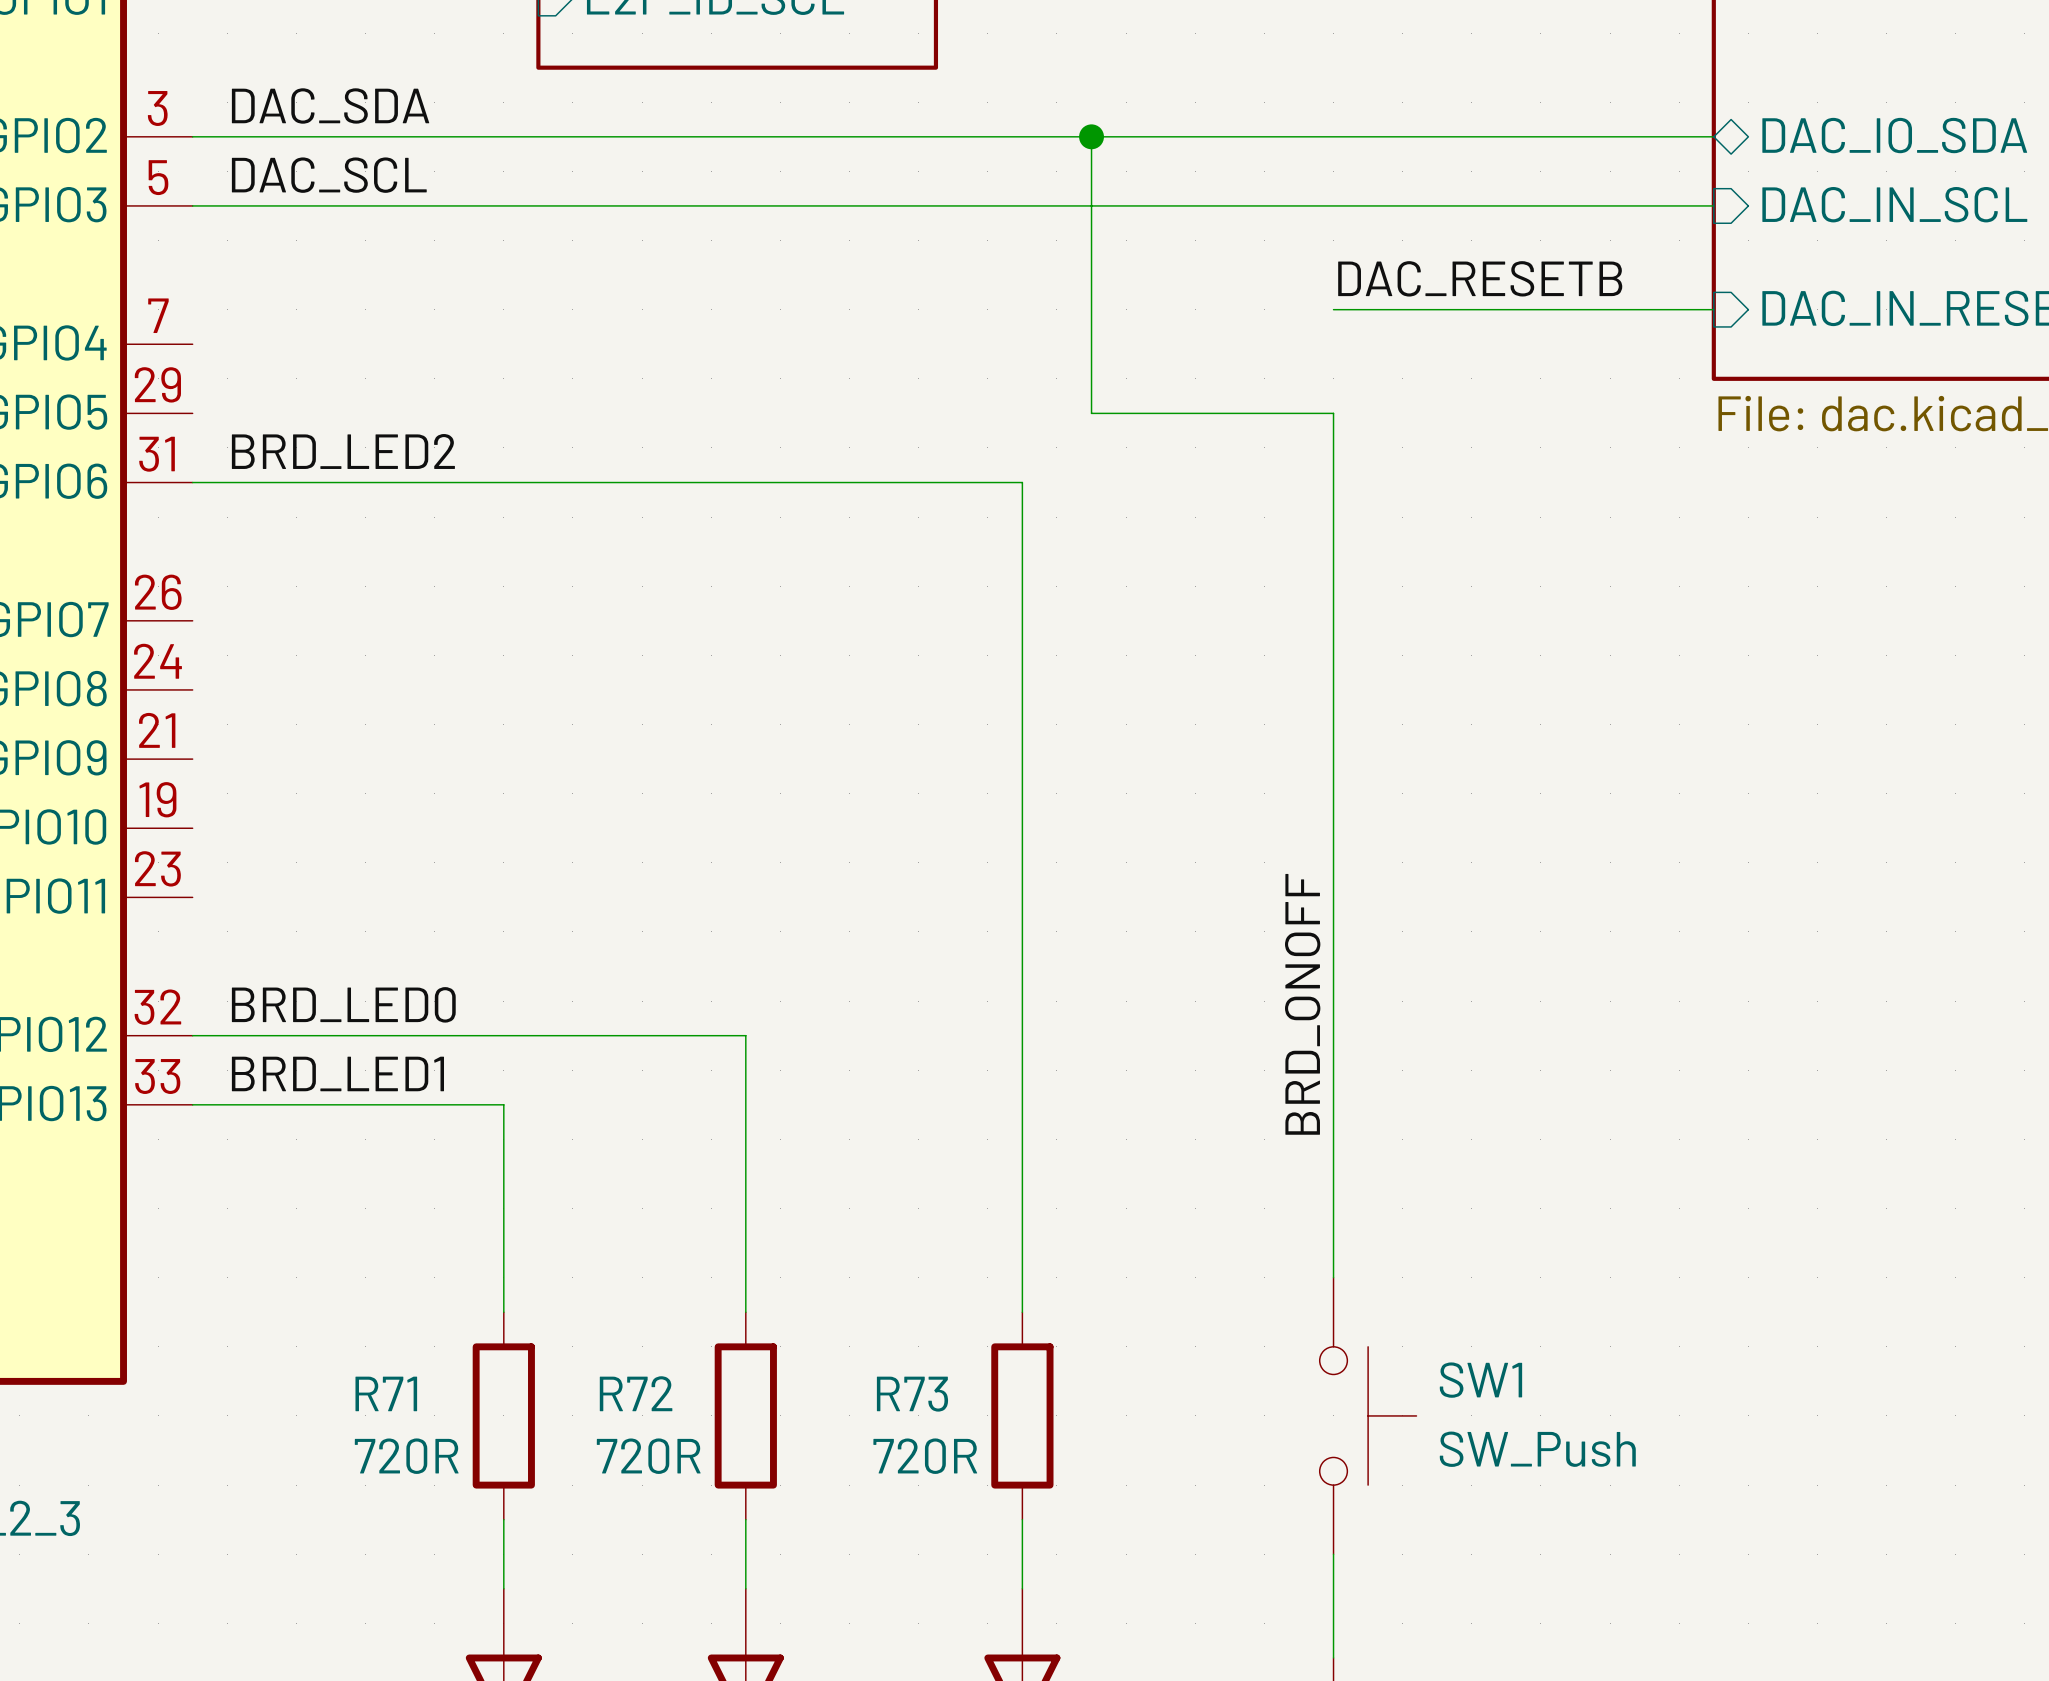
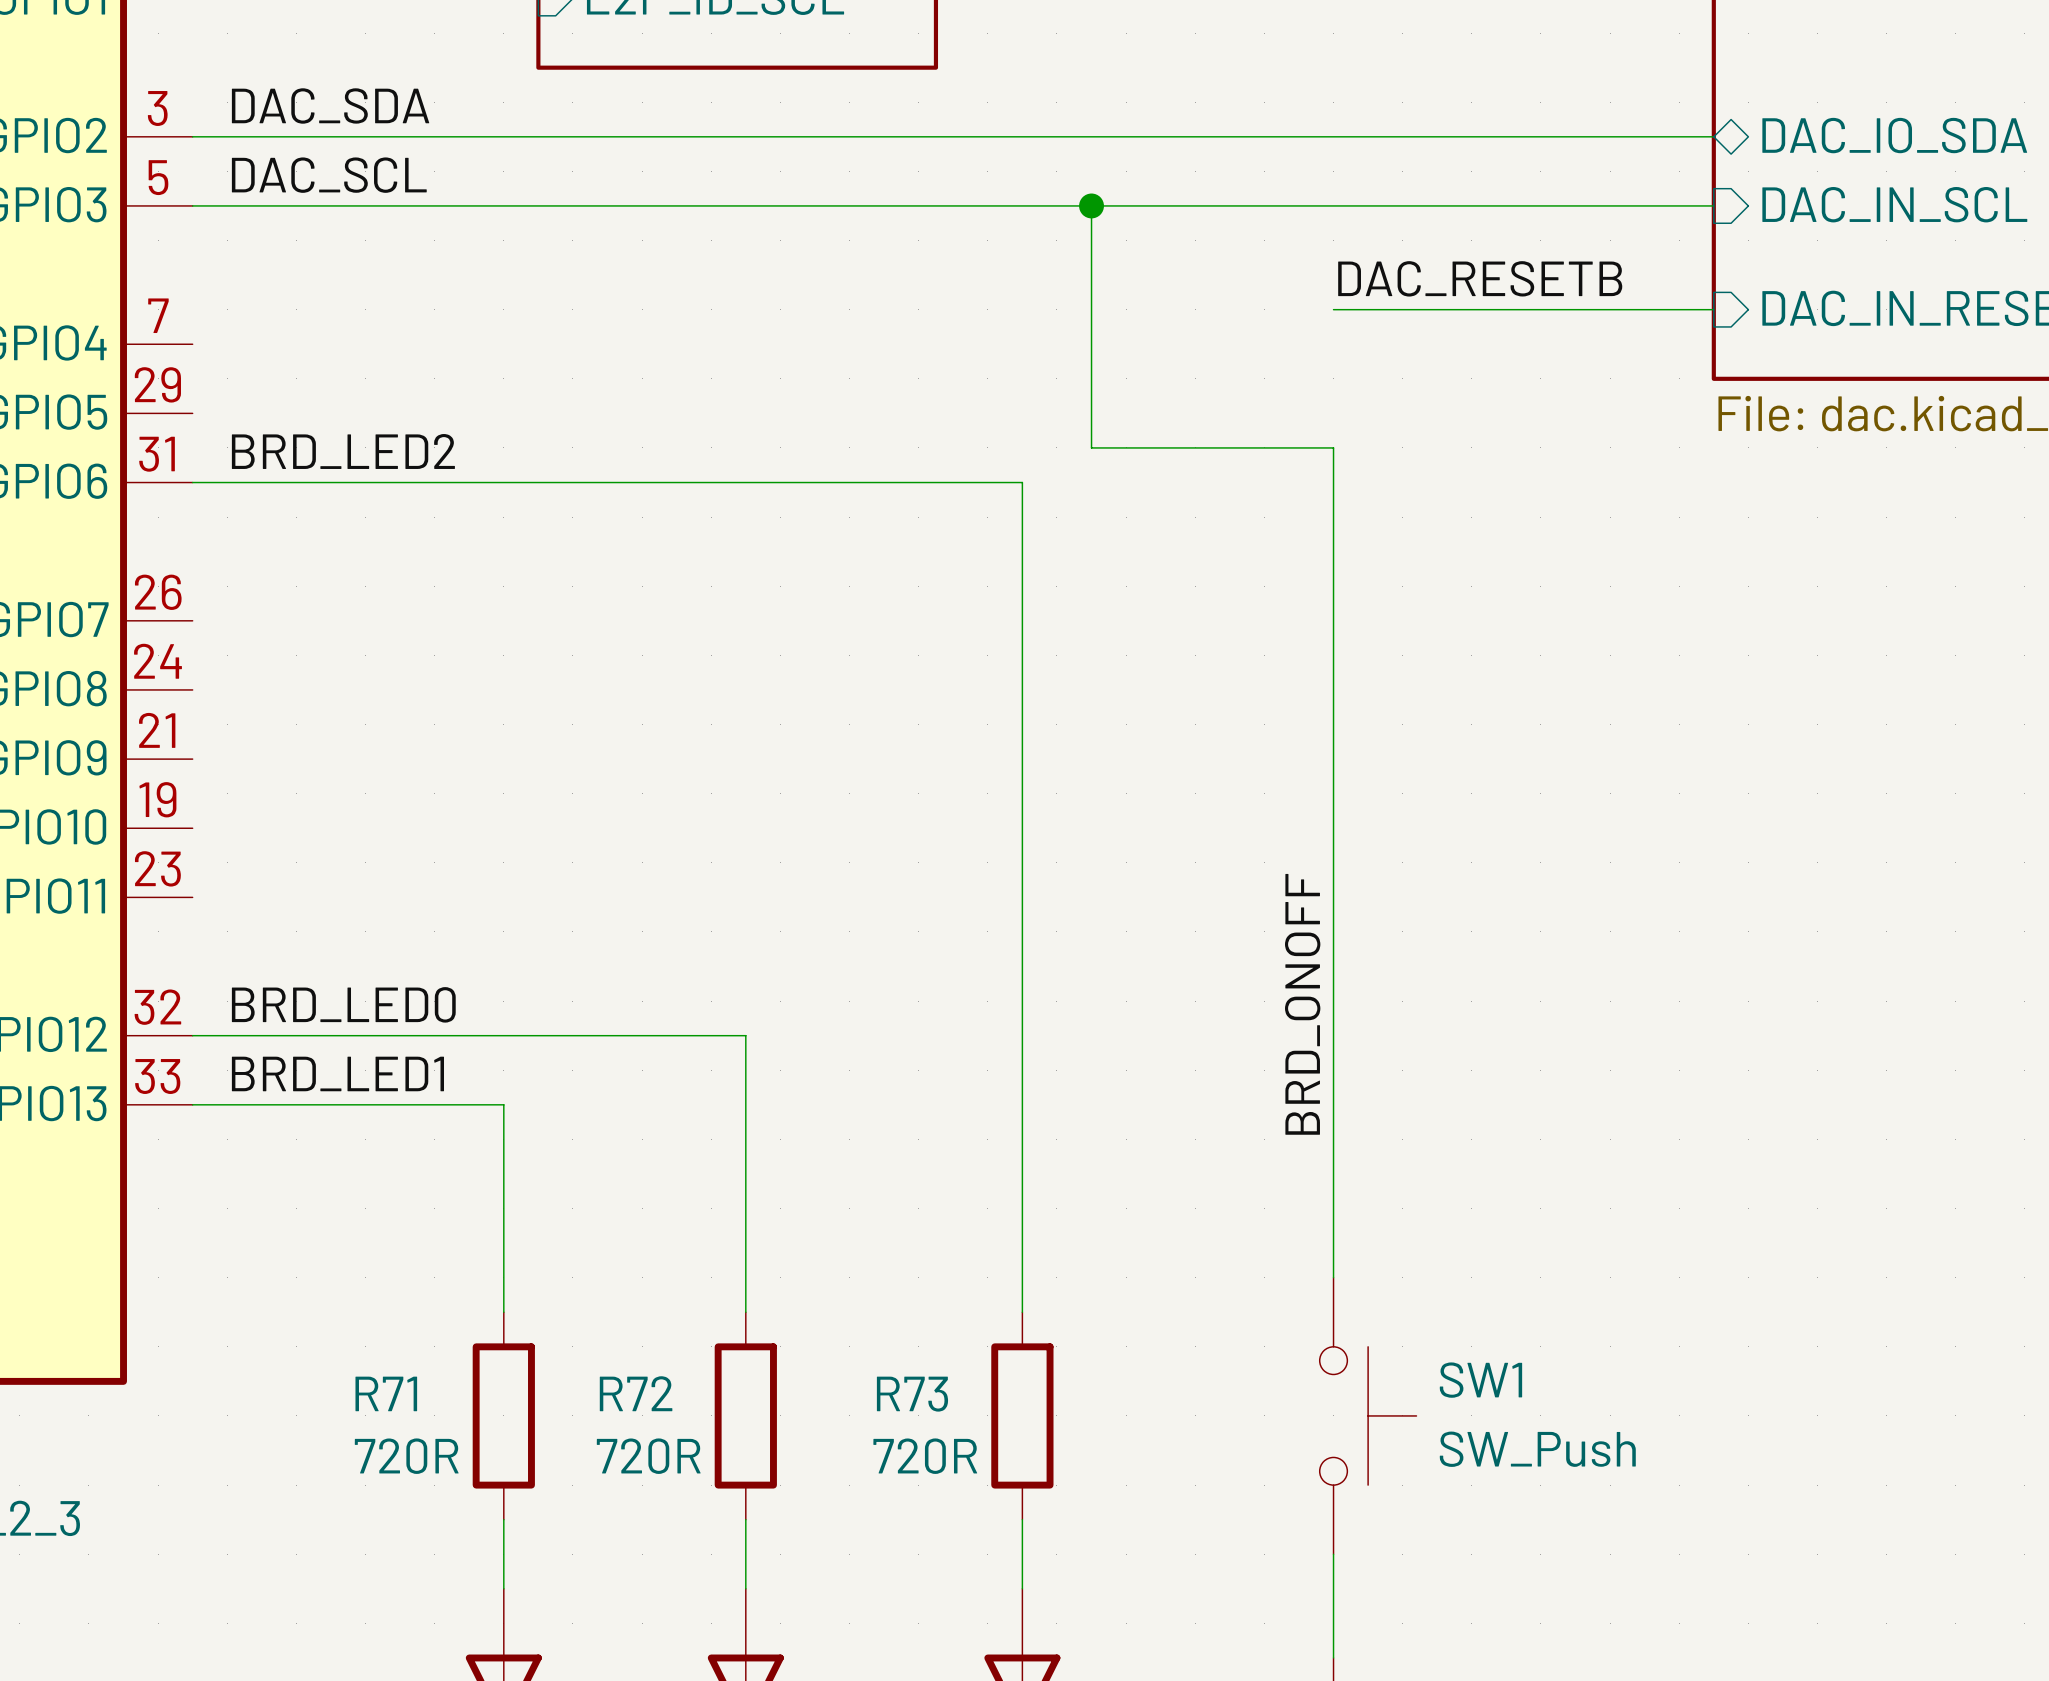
wire: (1091, 136) (1091, 205) -> none
junction position: (1091, 136) -> (1091, 205)
wire: (1091, 413) (1333, 413) (1333, 447) -> (1091, 413) (1091, 447) (1333, 447)

